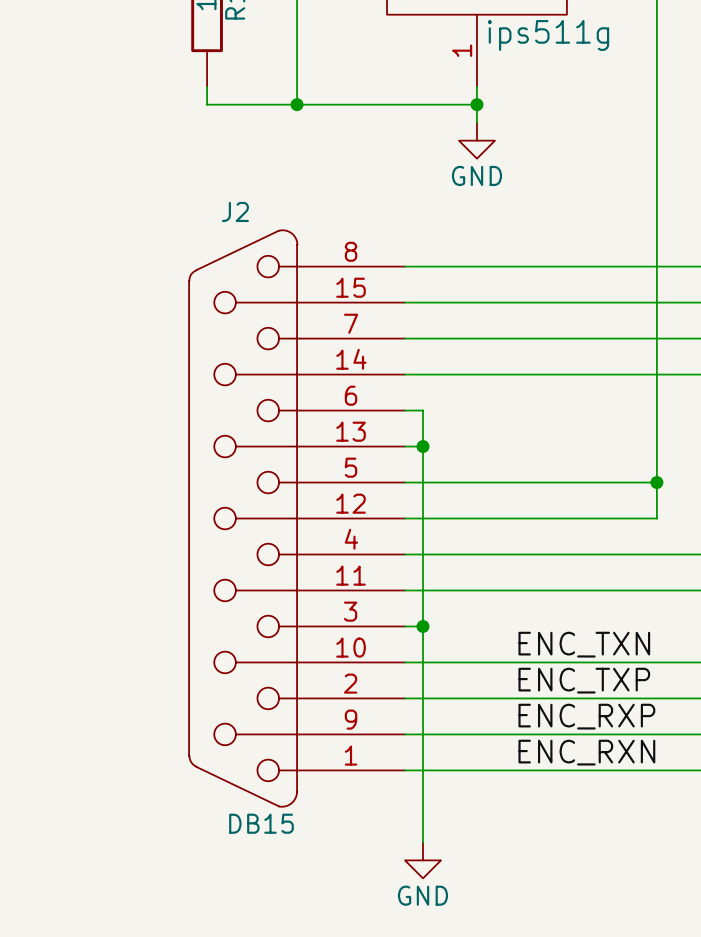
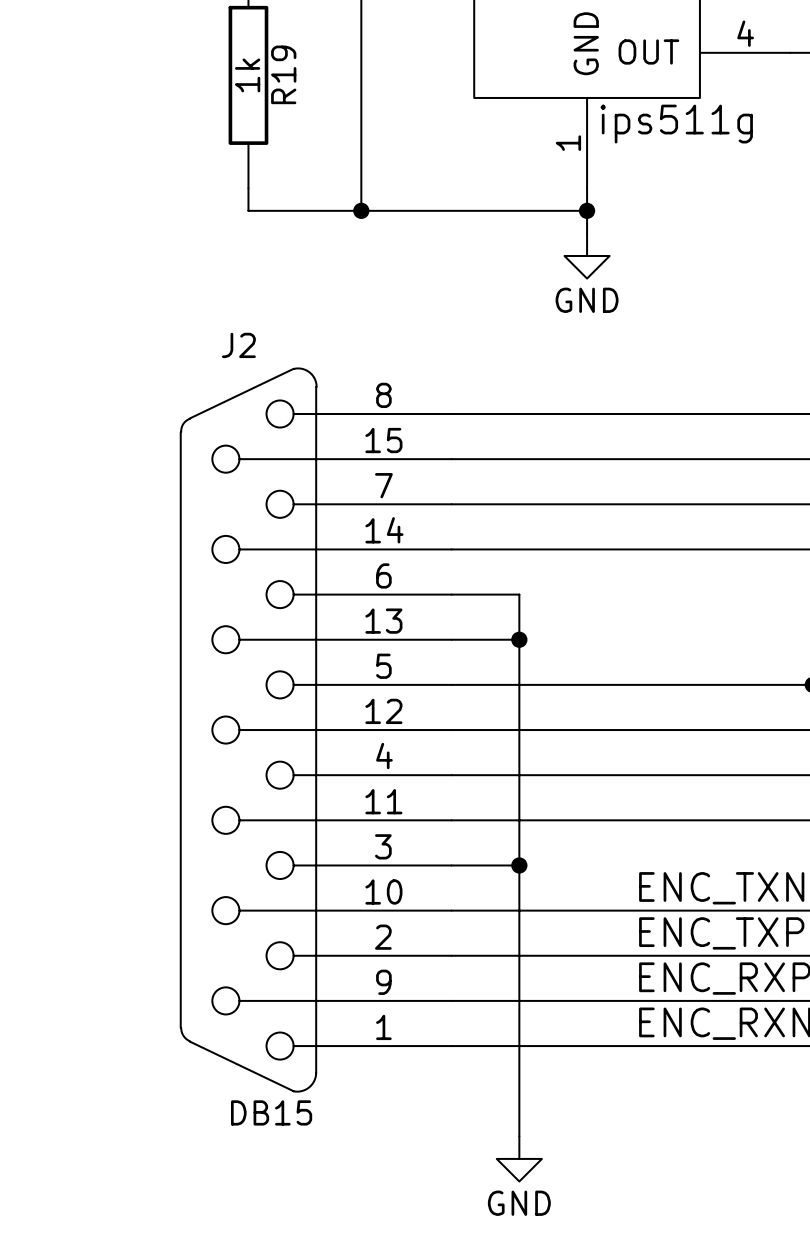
J2 position: (297, 518) -> (316, 730)

